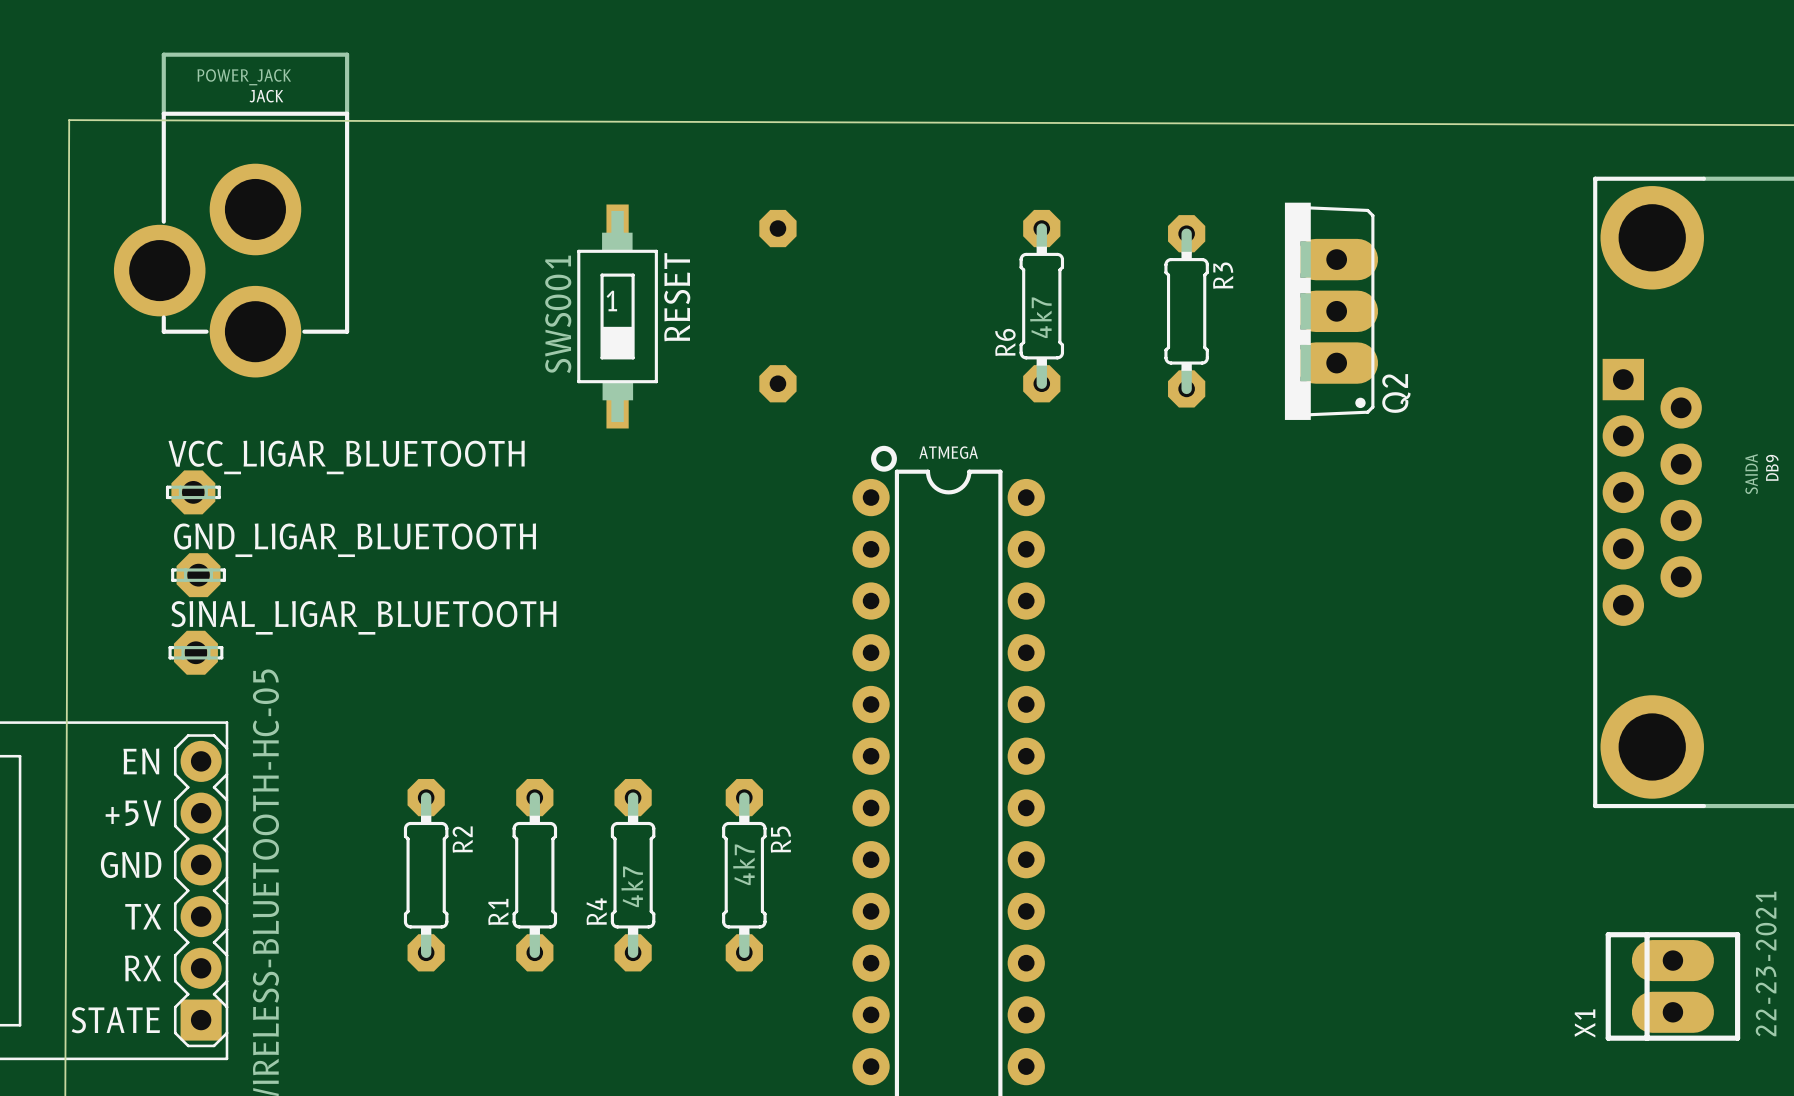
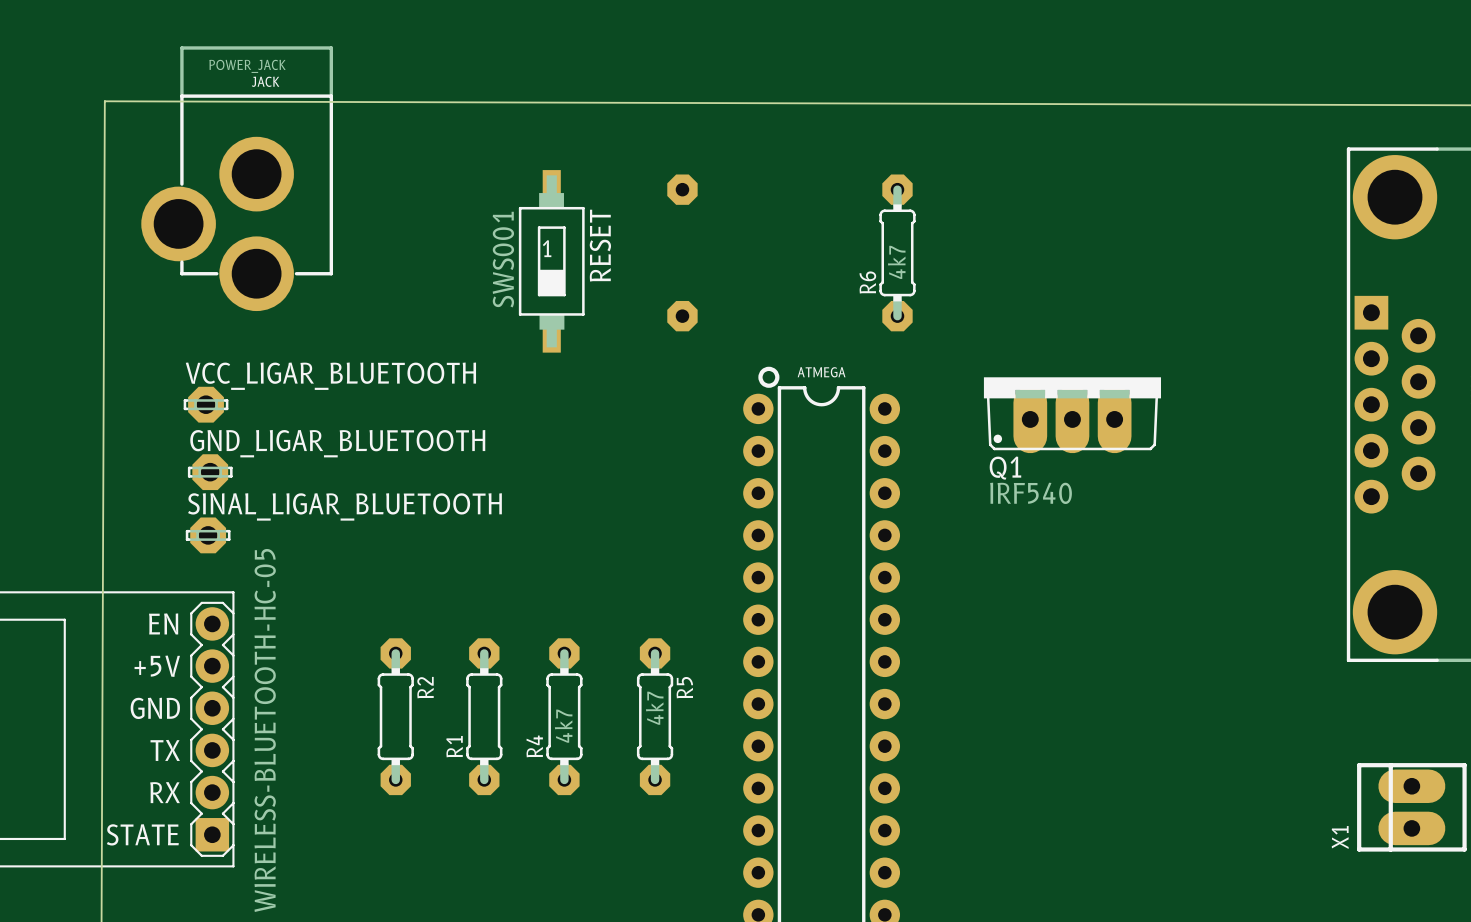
R3: (1186, 311) -> none
Q2: (1331, 311) -> none
Q1: none -> IRF540 (1072, 415)

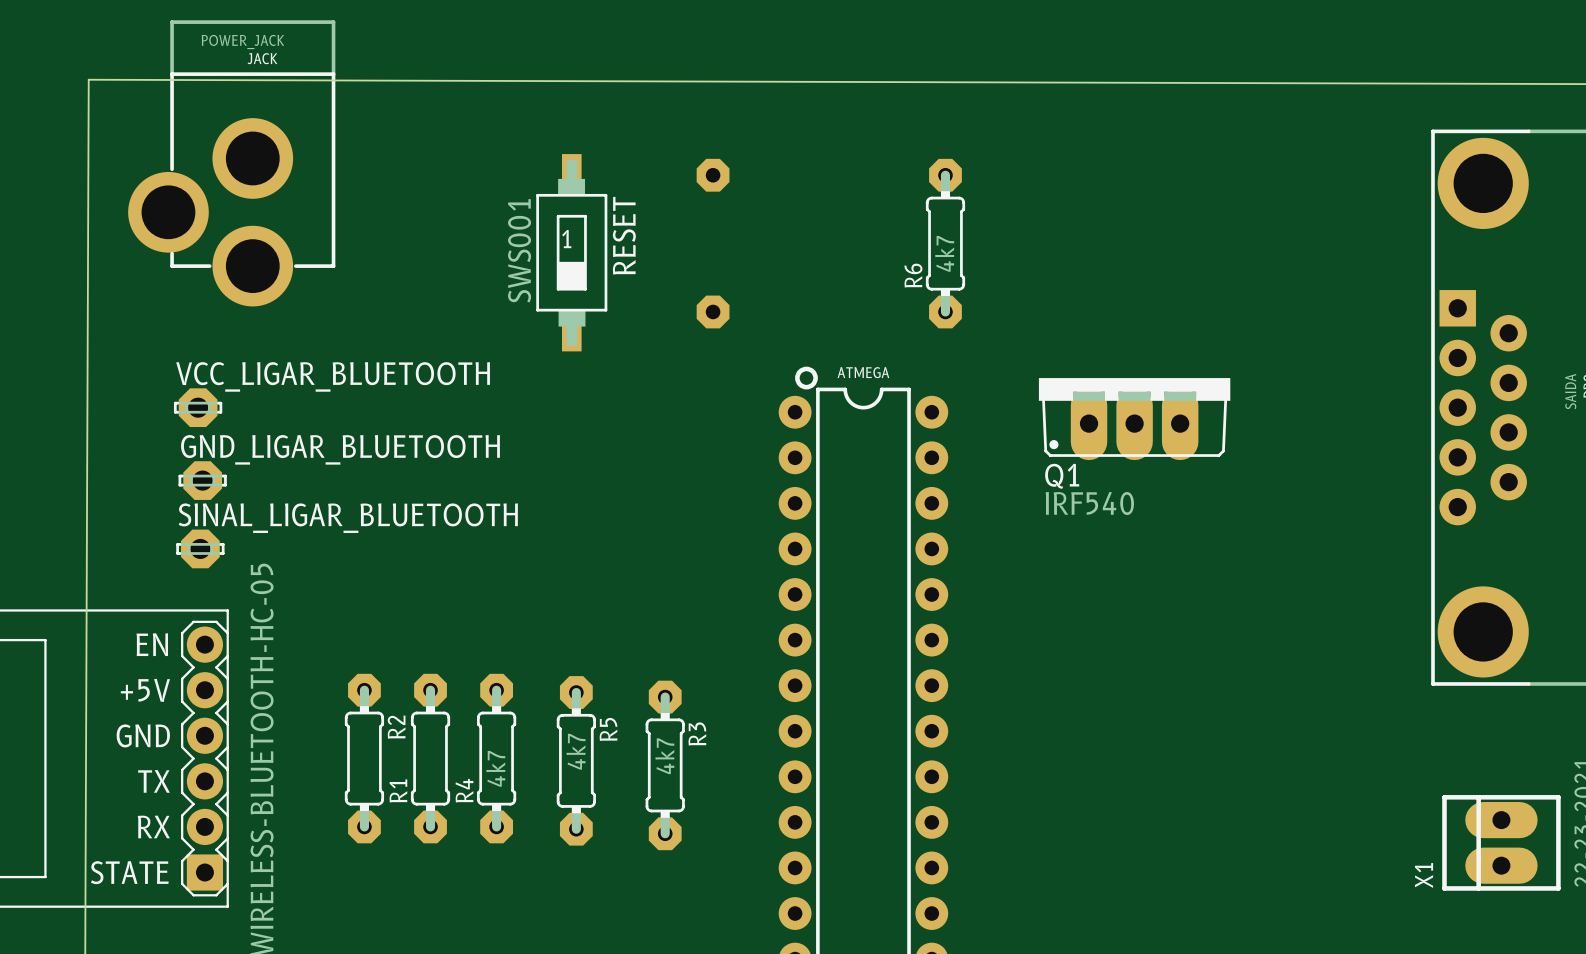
R2 position: (395, 716) -> (364, 758)
R1 position: (484, 716) -> (430, 758)
R4 position: (564, 716) -> (496, 758)
R5 position: (655, 716) -> (576, 760)
R3: none -> 4k7 (665, 765)

